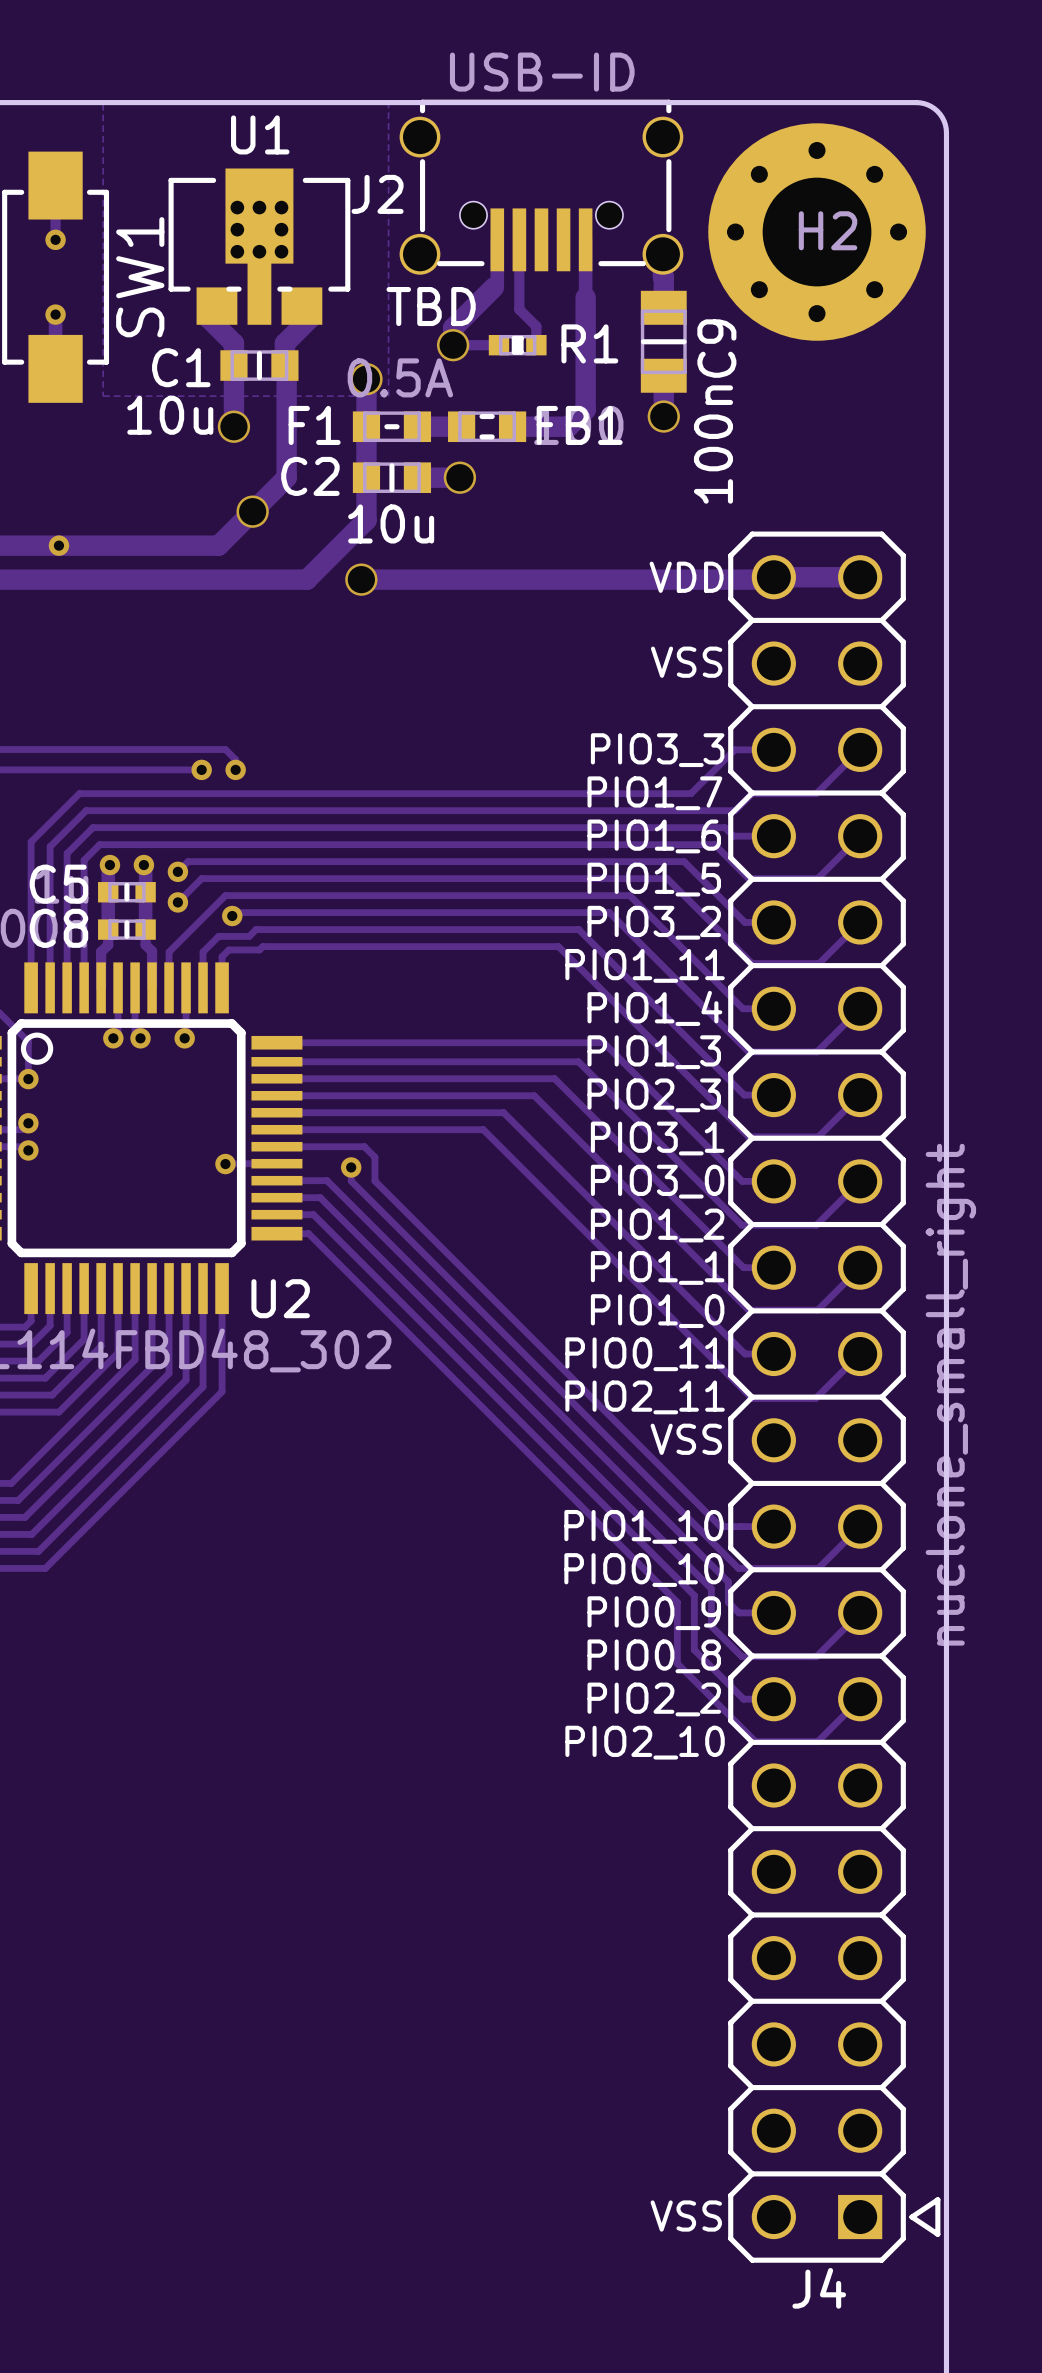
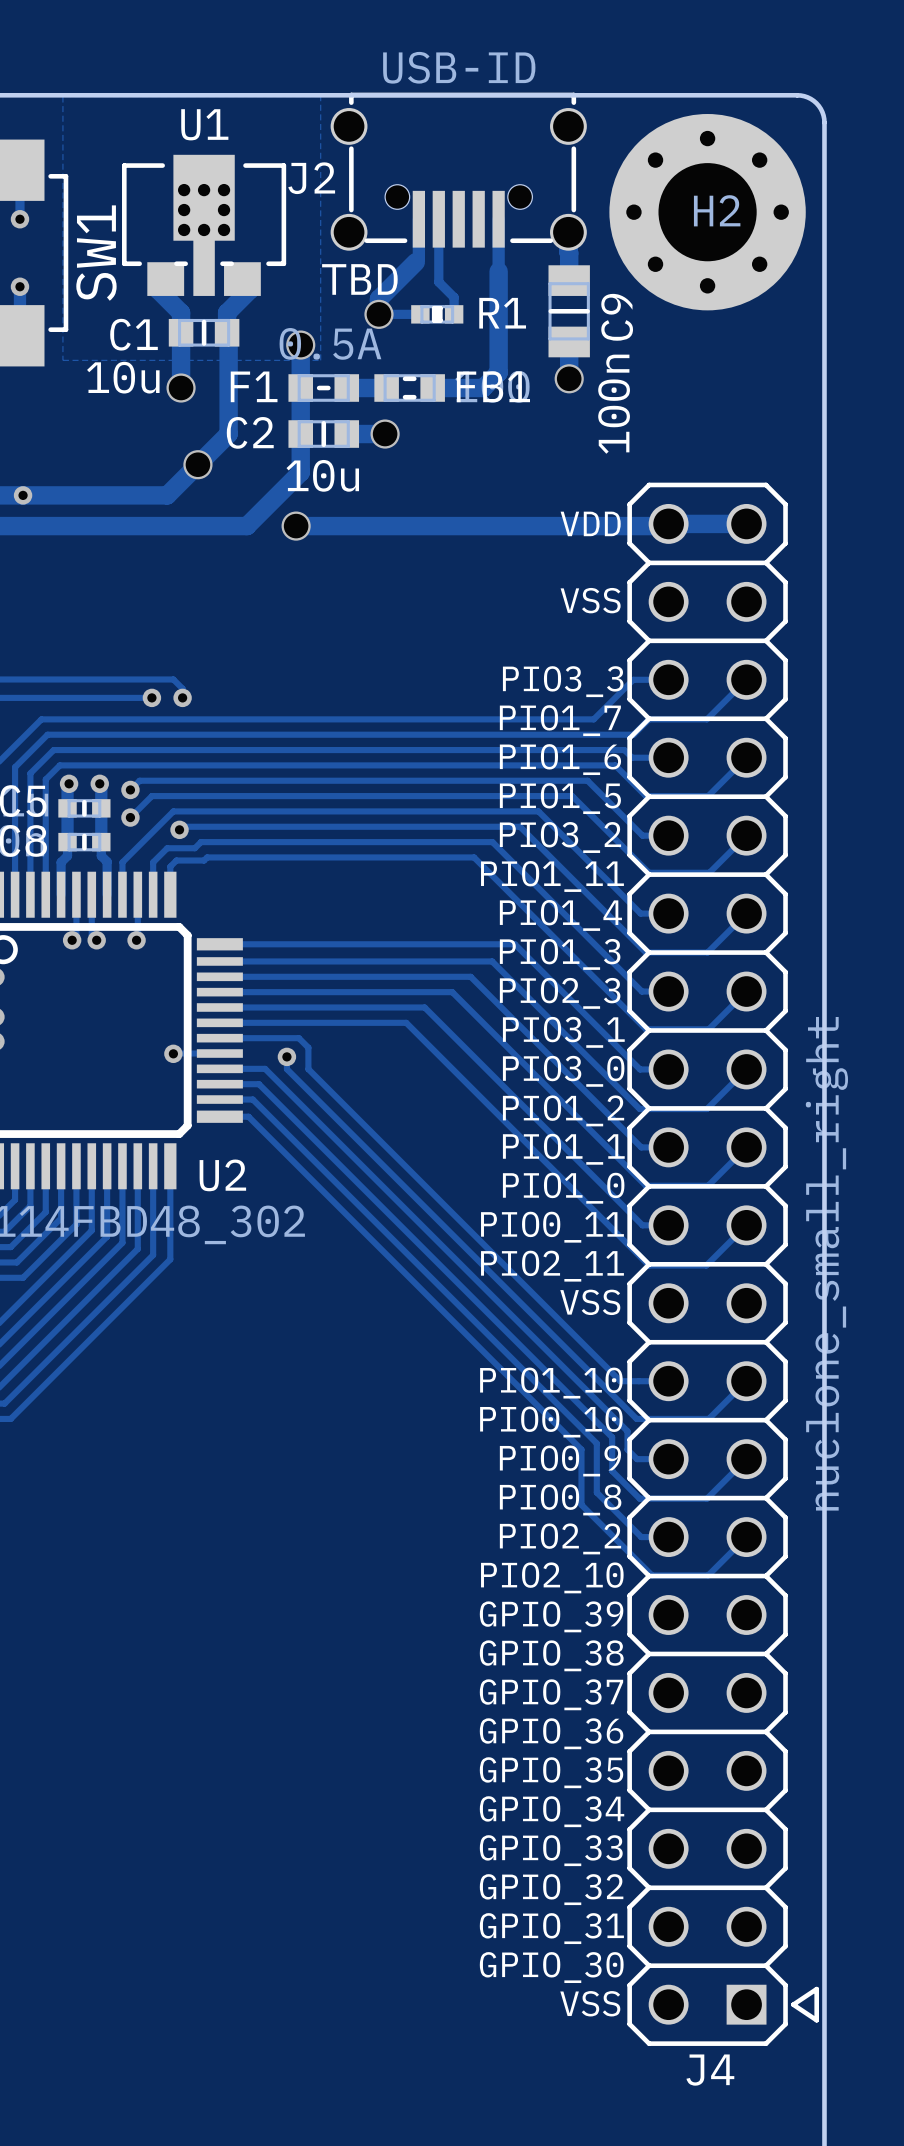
J4 footprint: [728, 531, 941, 2263] -> [627, 482, 819, 2046]

